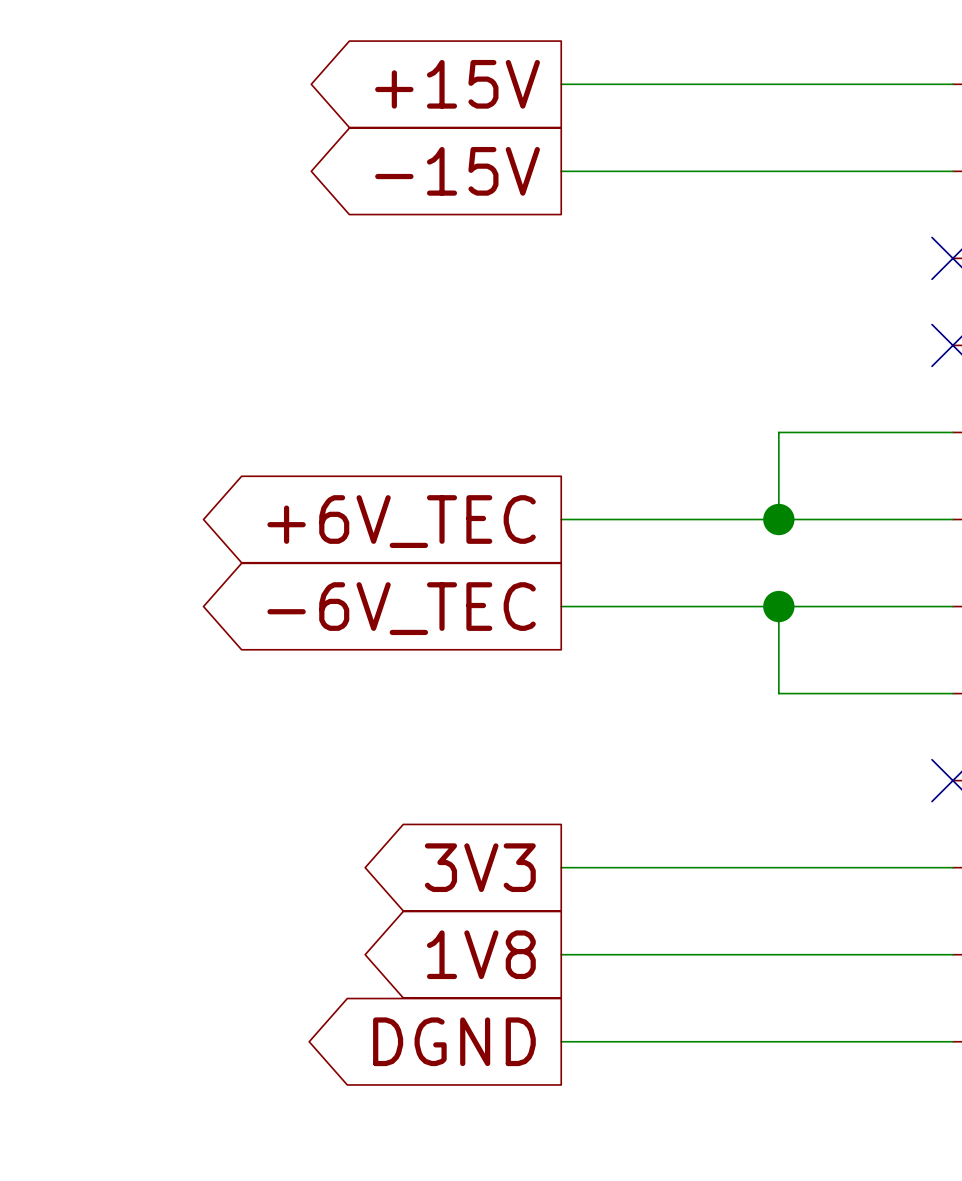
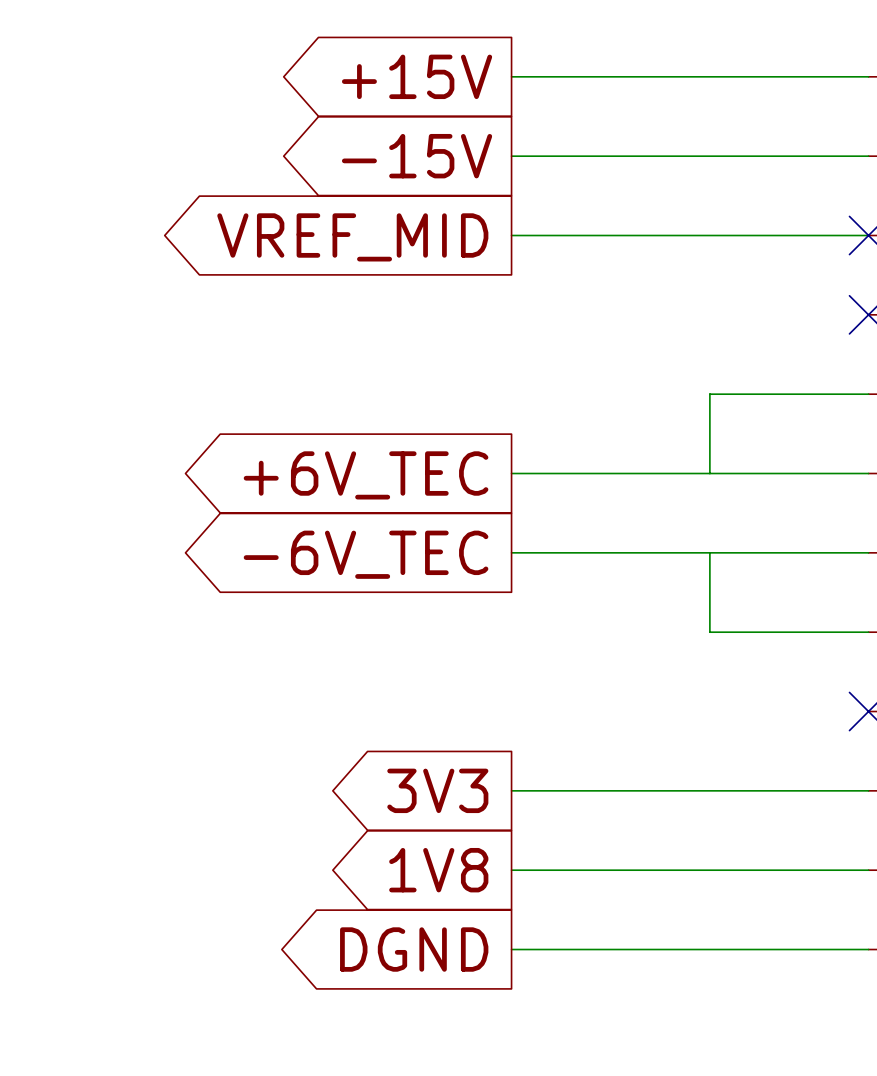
wire: none -> (511, 235) (868, 235)
global label: none -> VREF_MID (352, 237)
junction: (778, 519) -> none
junction: (778, 606) -> none

